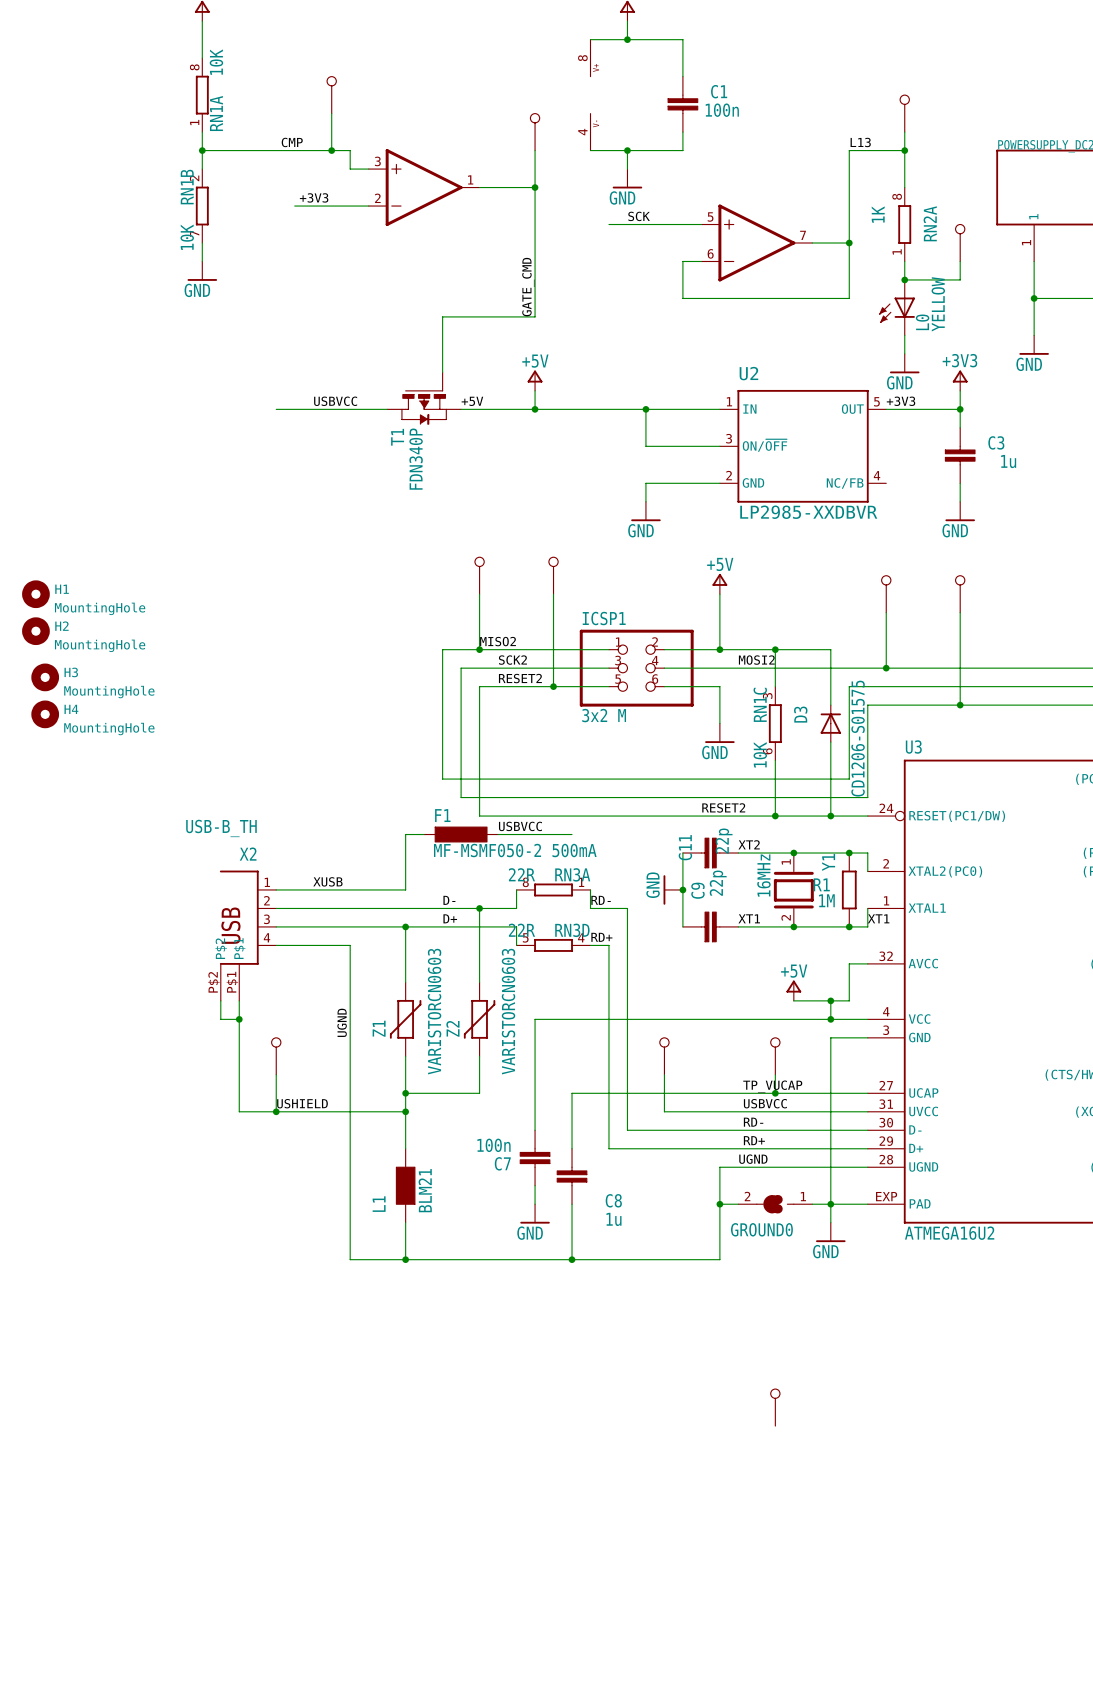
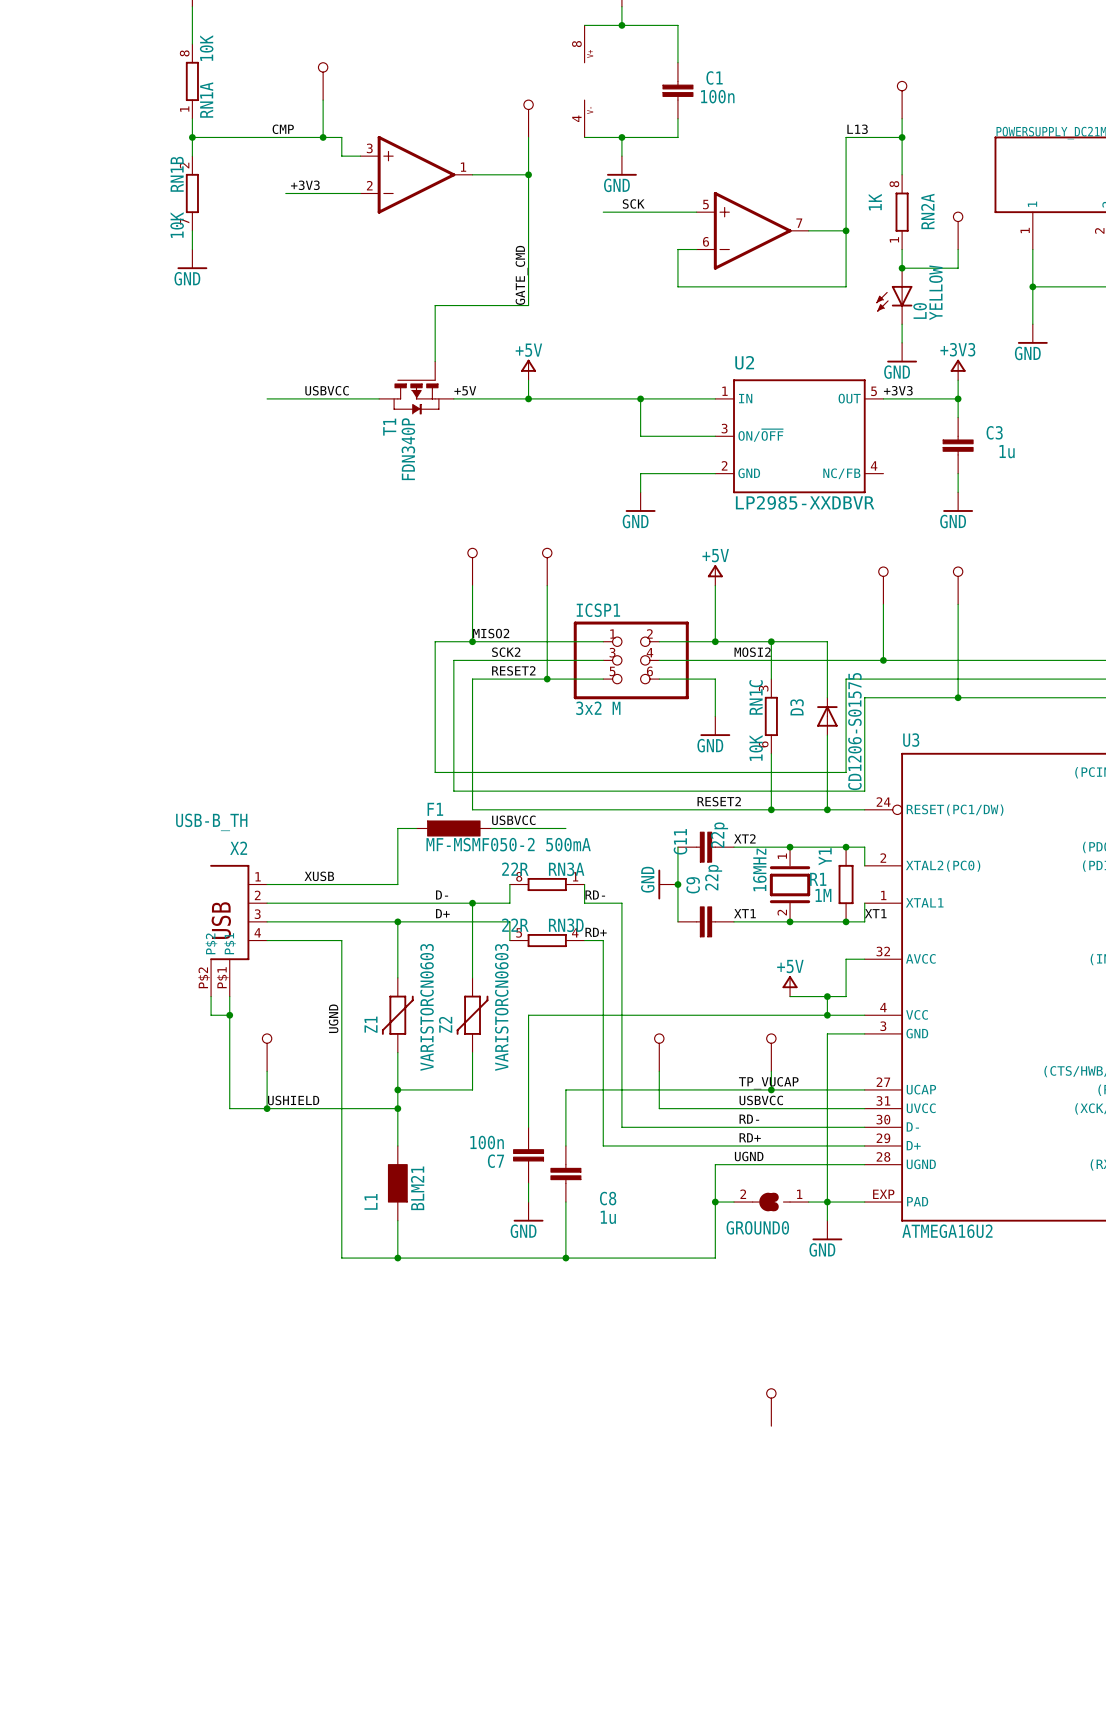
H1: MountingHole (35, 594) -> none
H2: MountingHole (35, 631) -> none
H3: MountingHole (45, 677) -> none
H4: MountingHole (45, 714) -> none

